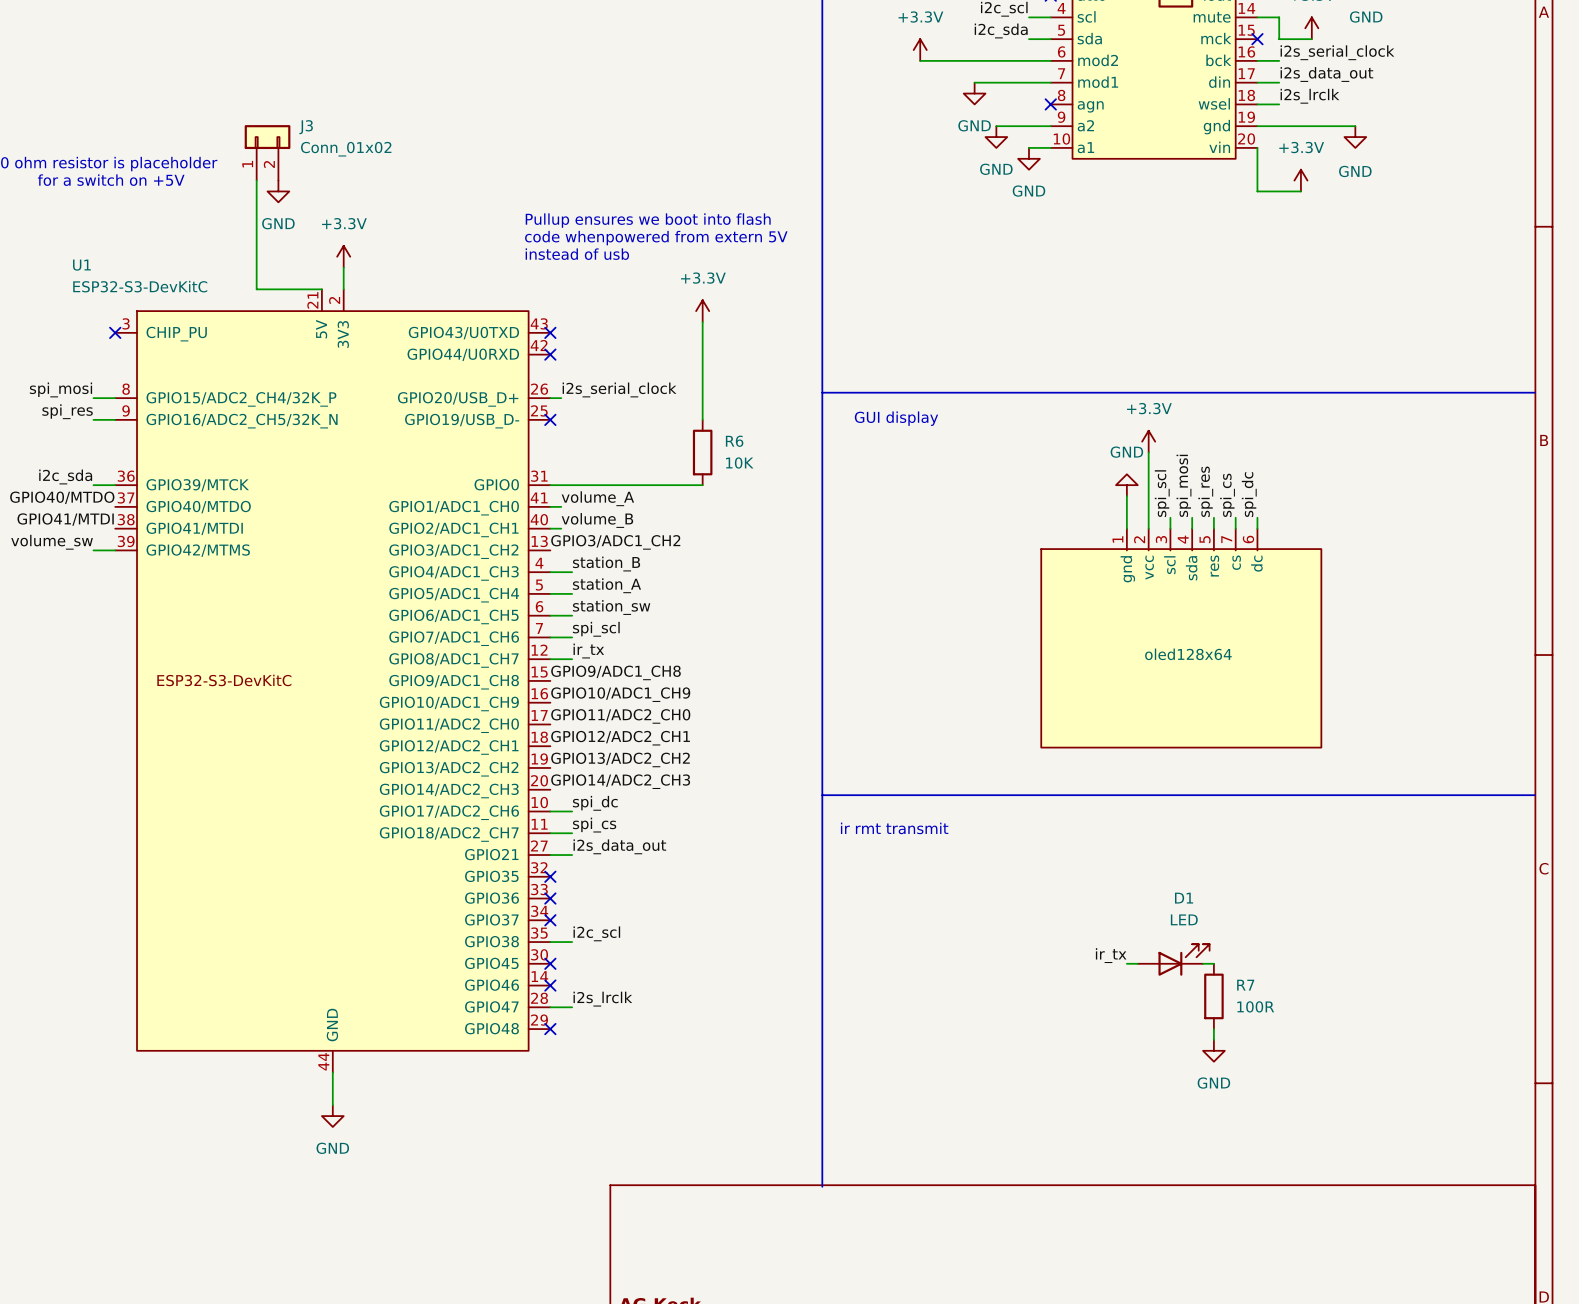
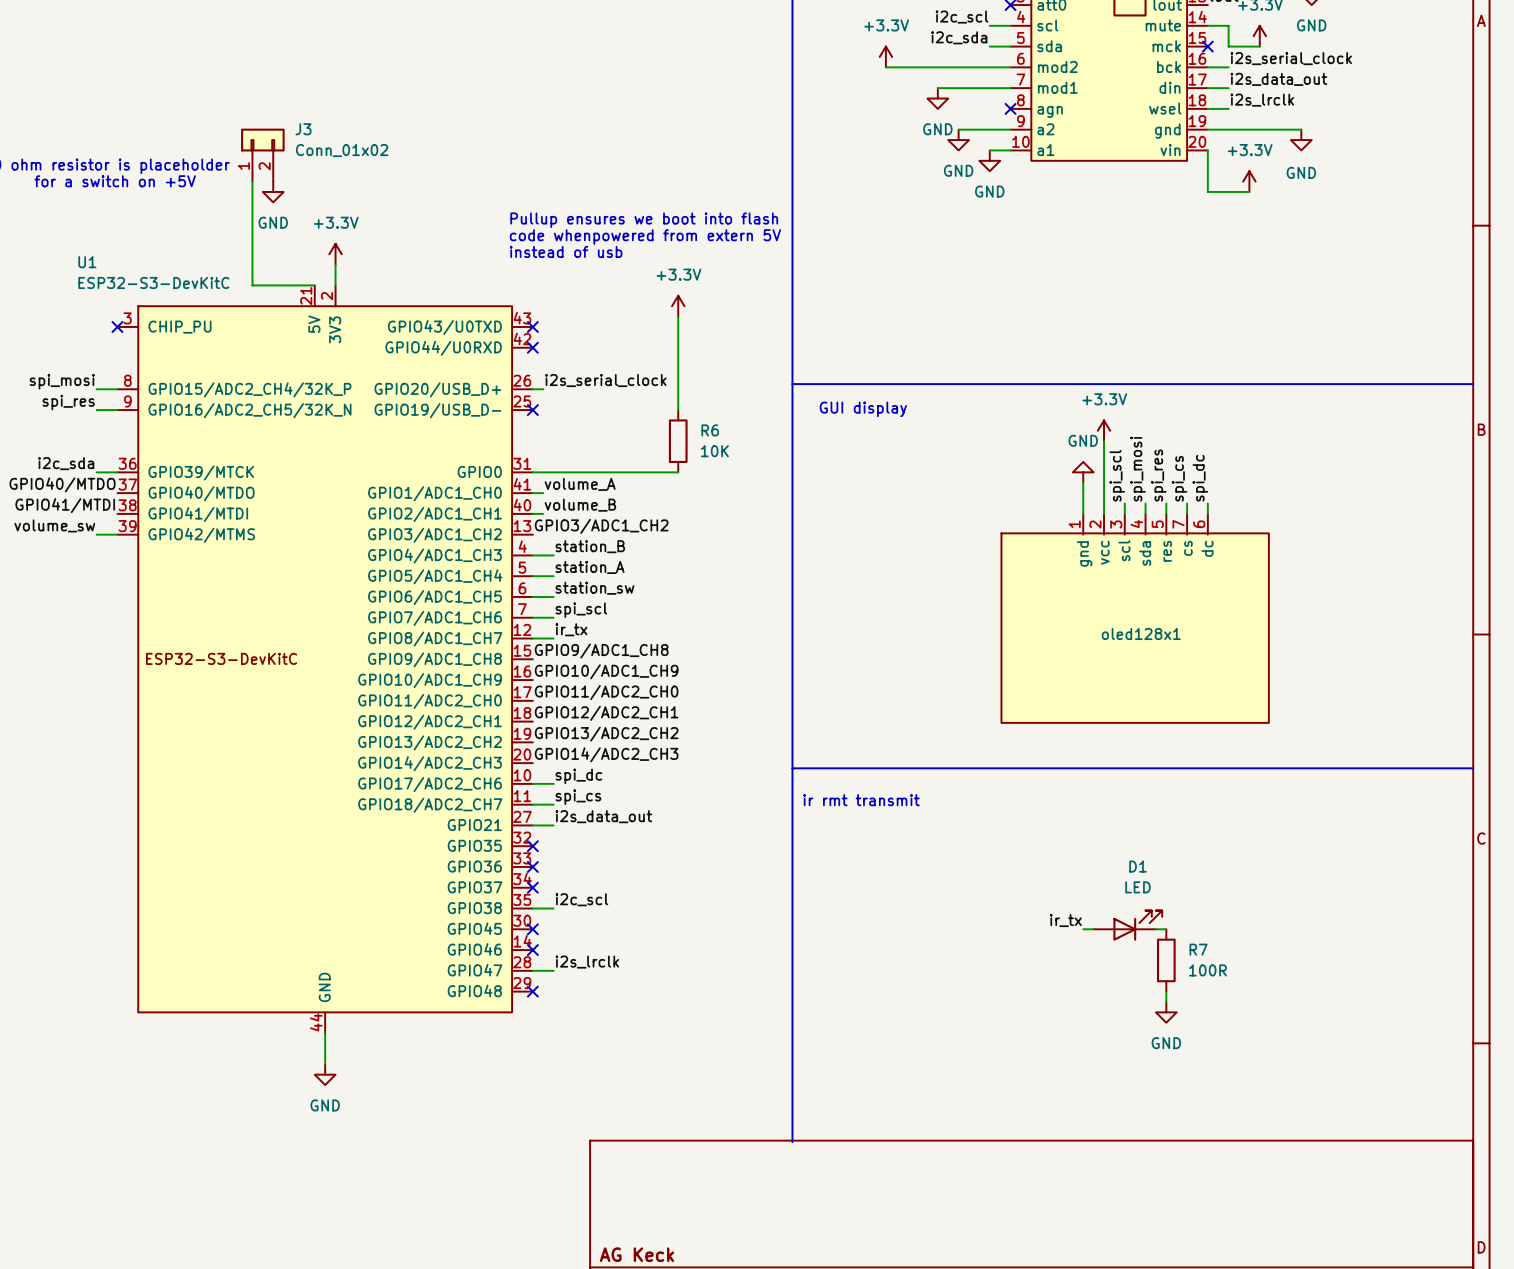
oled128x64 name: oled128x64 (1188, 654) -> oled128x1 (1141, 633)

